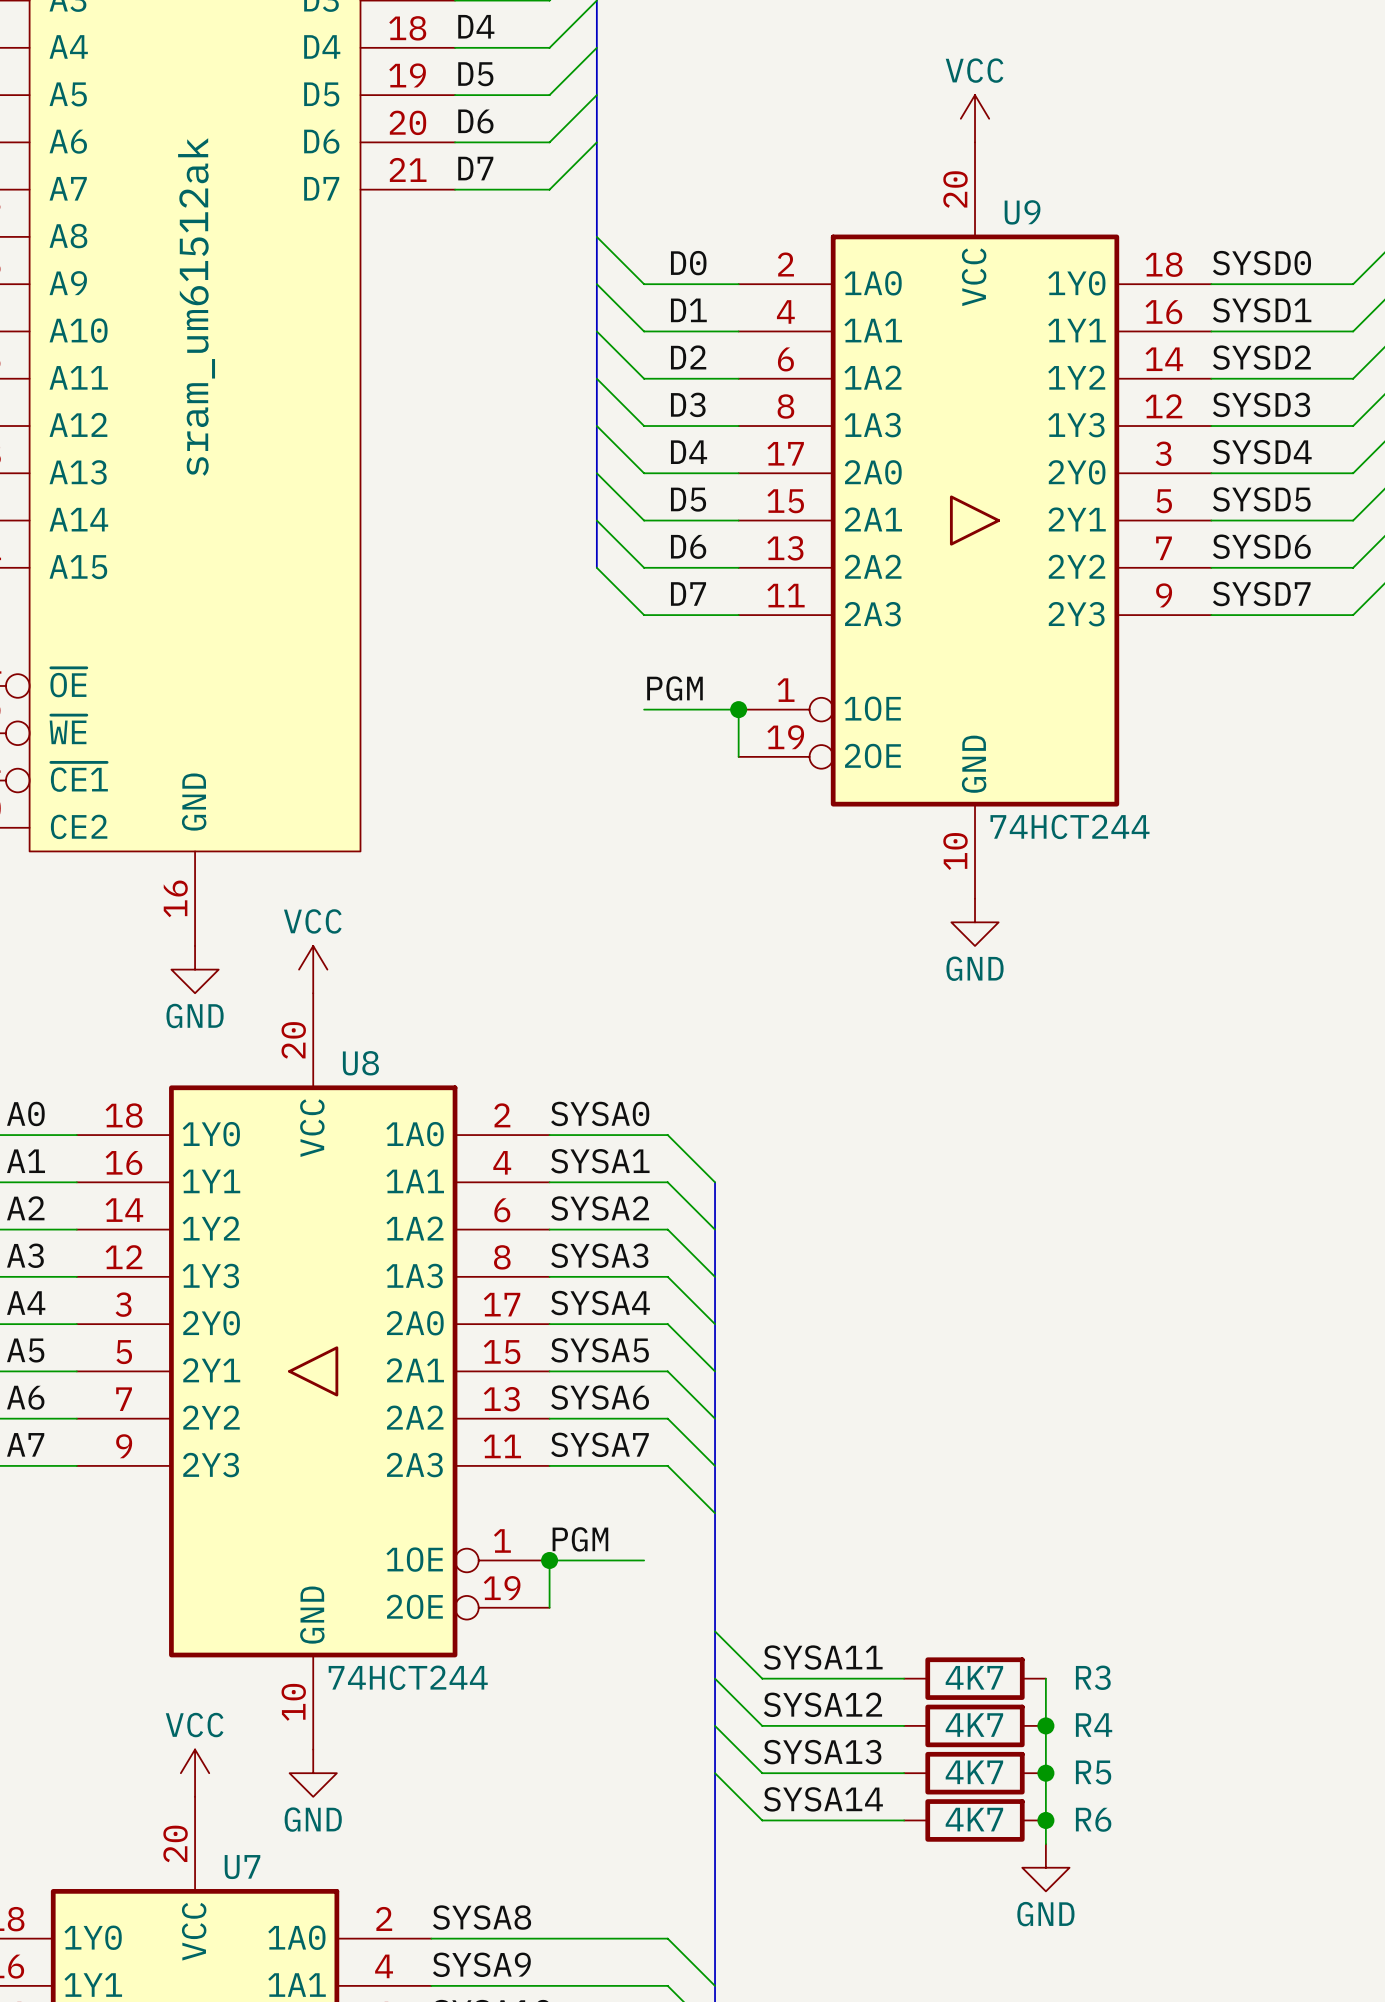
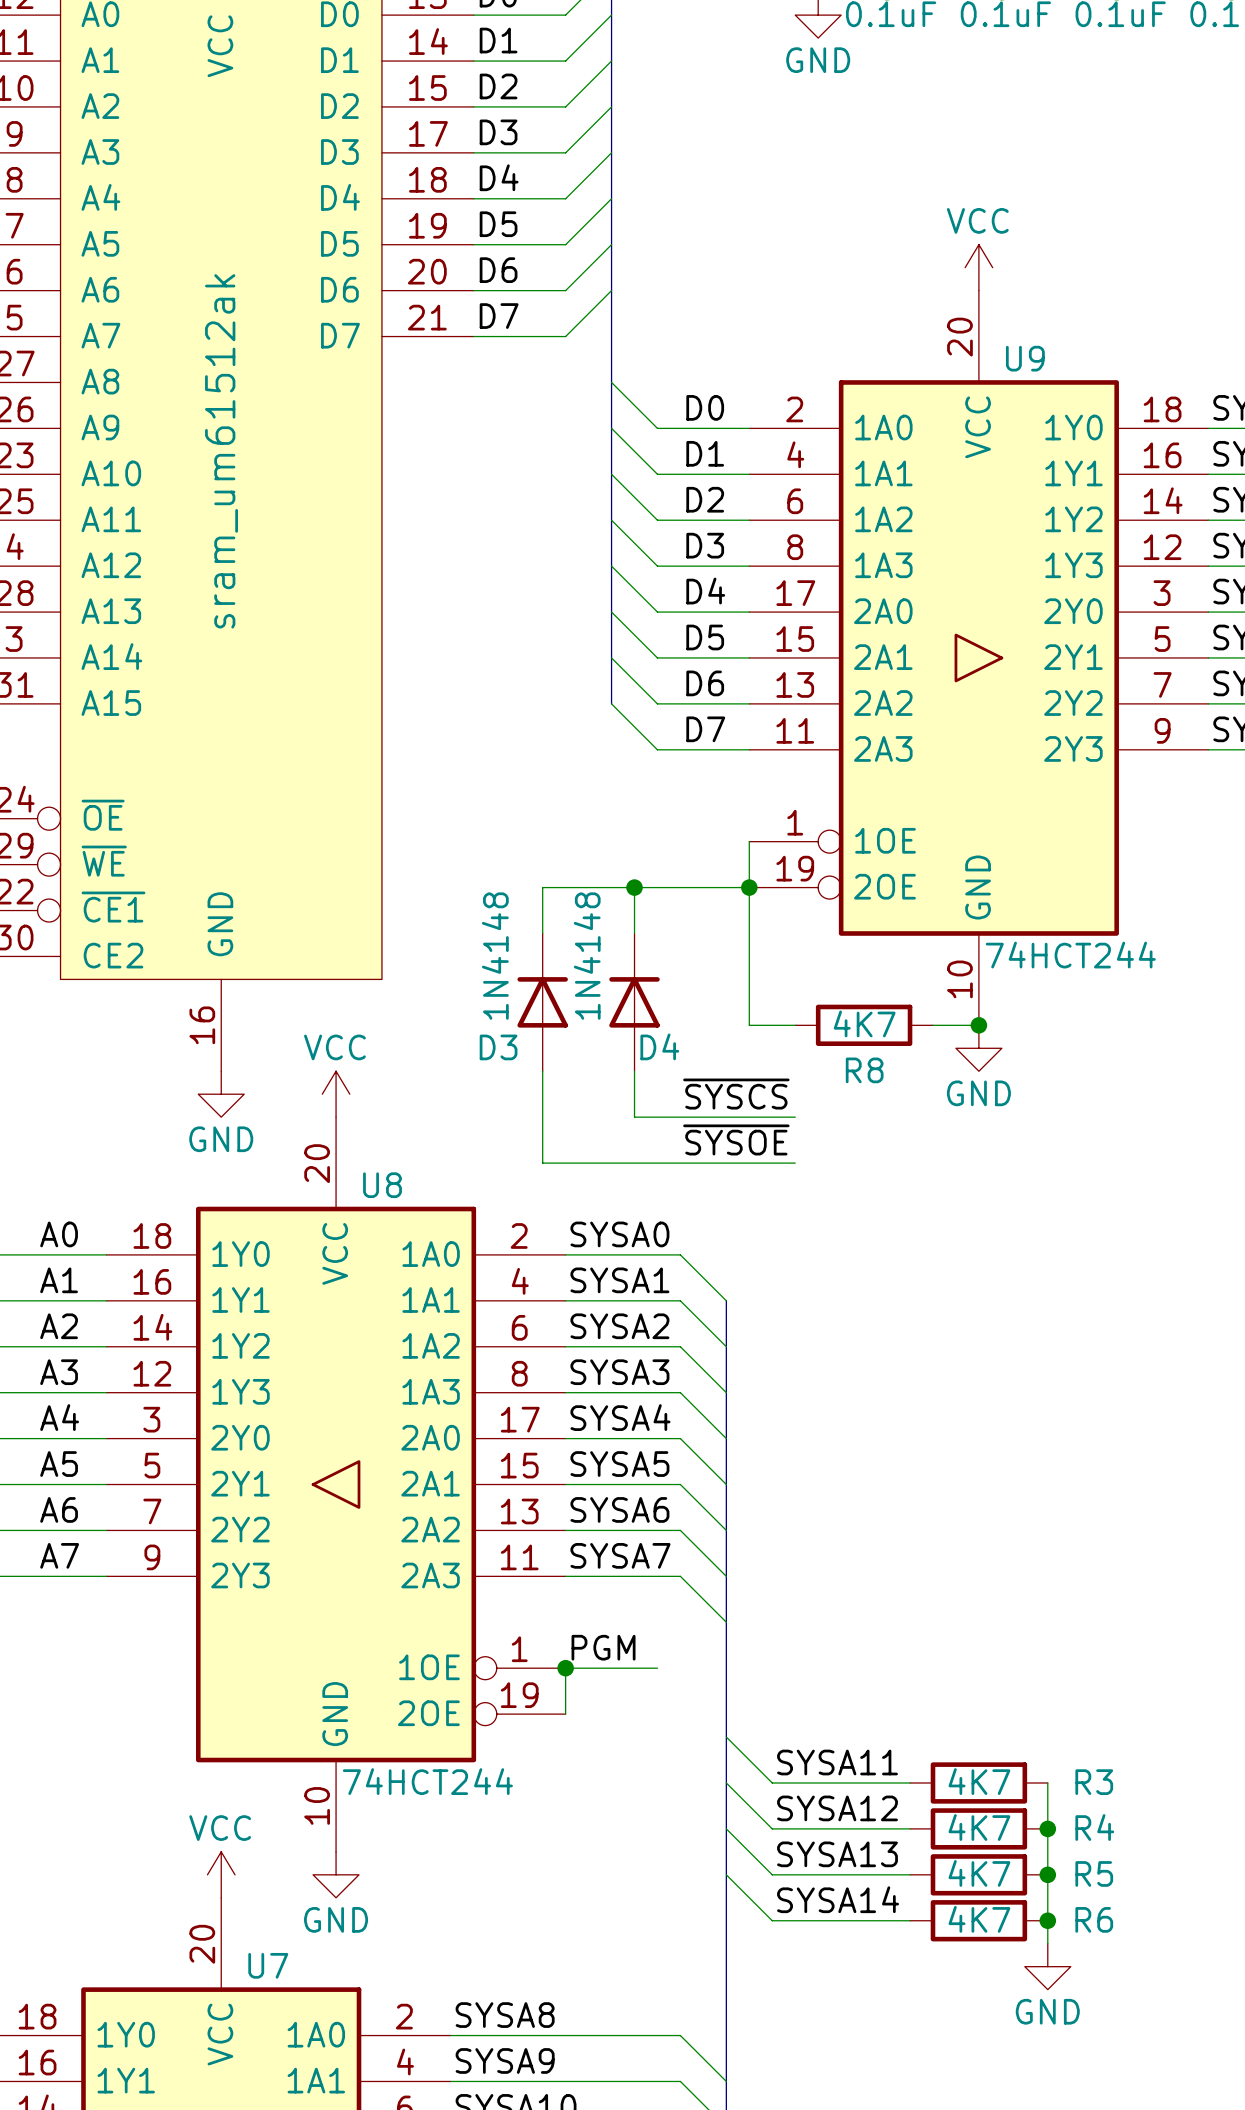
label: PGM (674, 688) -> none
wire: (644, 709) (738, 709) -> none
junction position: (738, 709) -> (749, 887)
wire: none -> (634, 887) (634, 933)
junction: none -> (634, 887)
wire: none -> (542, 933) (542, 887) (749, 887) (749, 1025) (795, 1025)
D3: none -> 1N4148 (542, 1002)
D4: none -> 1N4148 (634, 1002)
R8: none -> 4K7 (864, 1025)
wire: none -> (932, 1025) (978, 1025)
junction: none -> (978, 1025)
wire: none -> (542, 1071) (542, 1163) (795, 1163)
wire: none -> (634, 1071) (634, 1117) (795, 1117)
label: none -> ~{SYSCS} (736, 1094)
label: none -> ~{SYSOE} (736, 1139)

